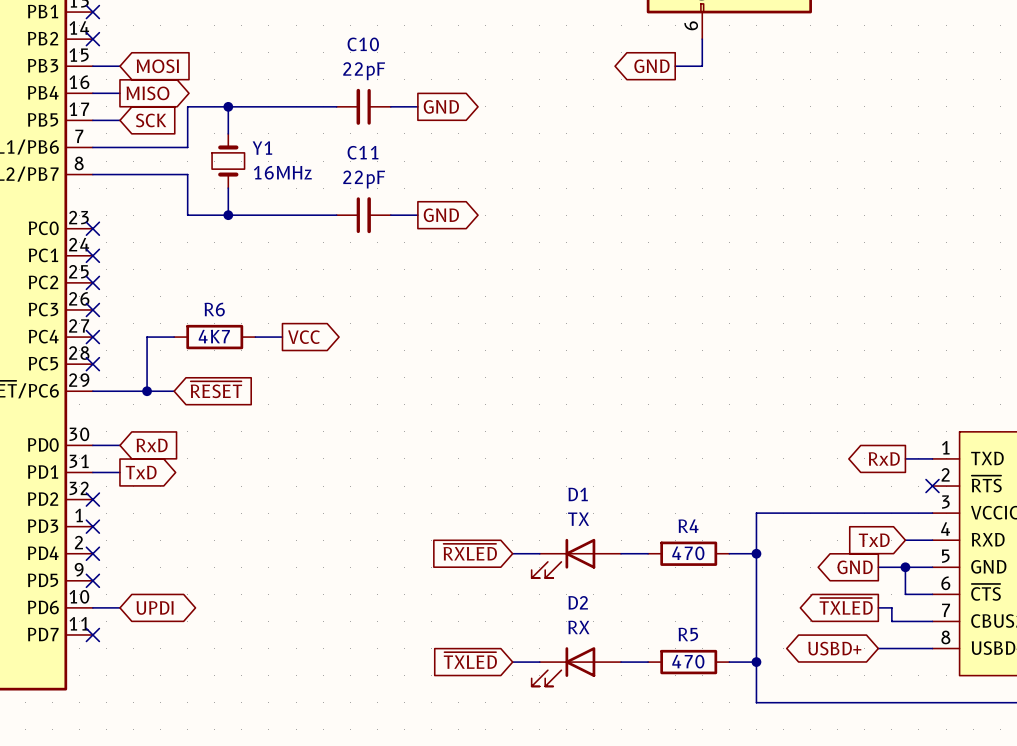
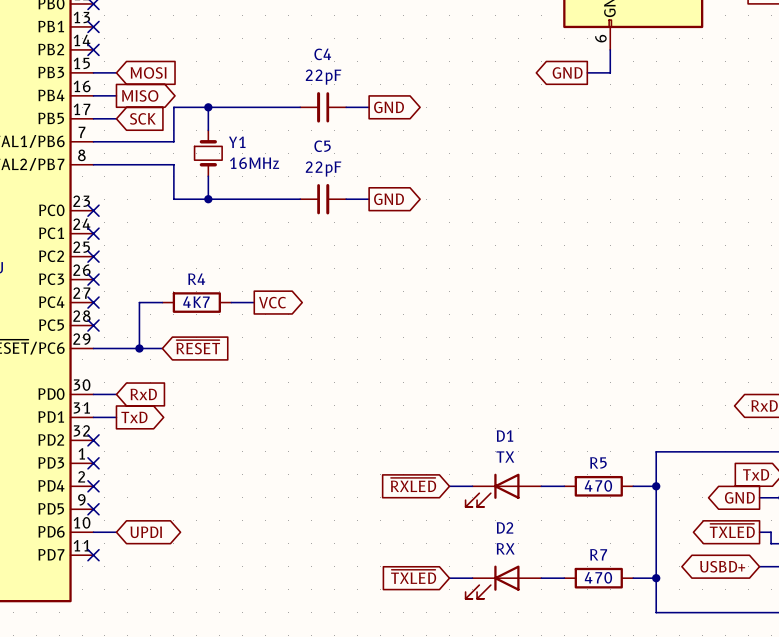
C10 name: C10 (363, 44) -> C4 (322, 54)
C11 name: C11 (363, 152) -> C5 (322, 146)
R6 name: R6 (214, 309) -> R4 (196, 279)
R4 name: R4 (688, 526) -> R5 (598, 462)
R5 name: R5 (688, 634) -> R7 (598, 554)

